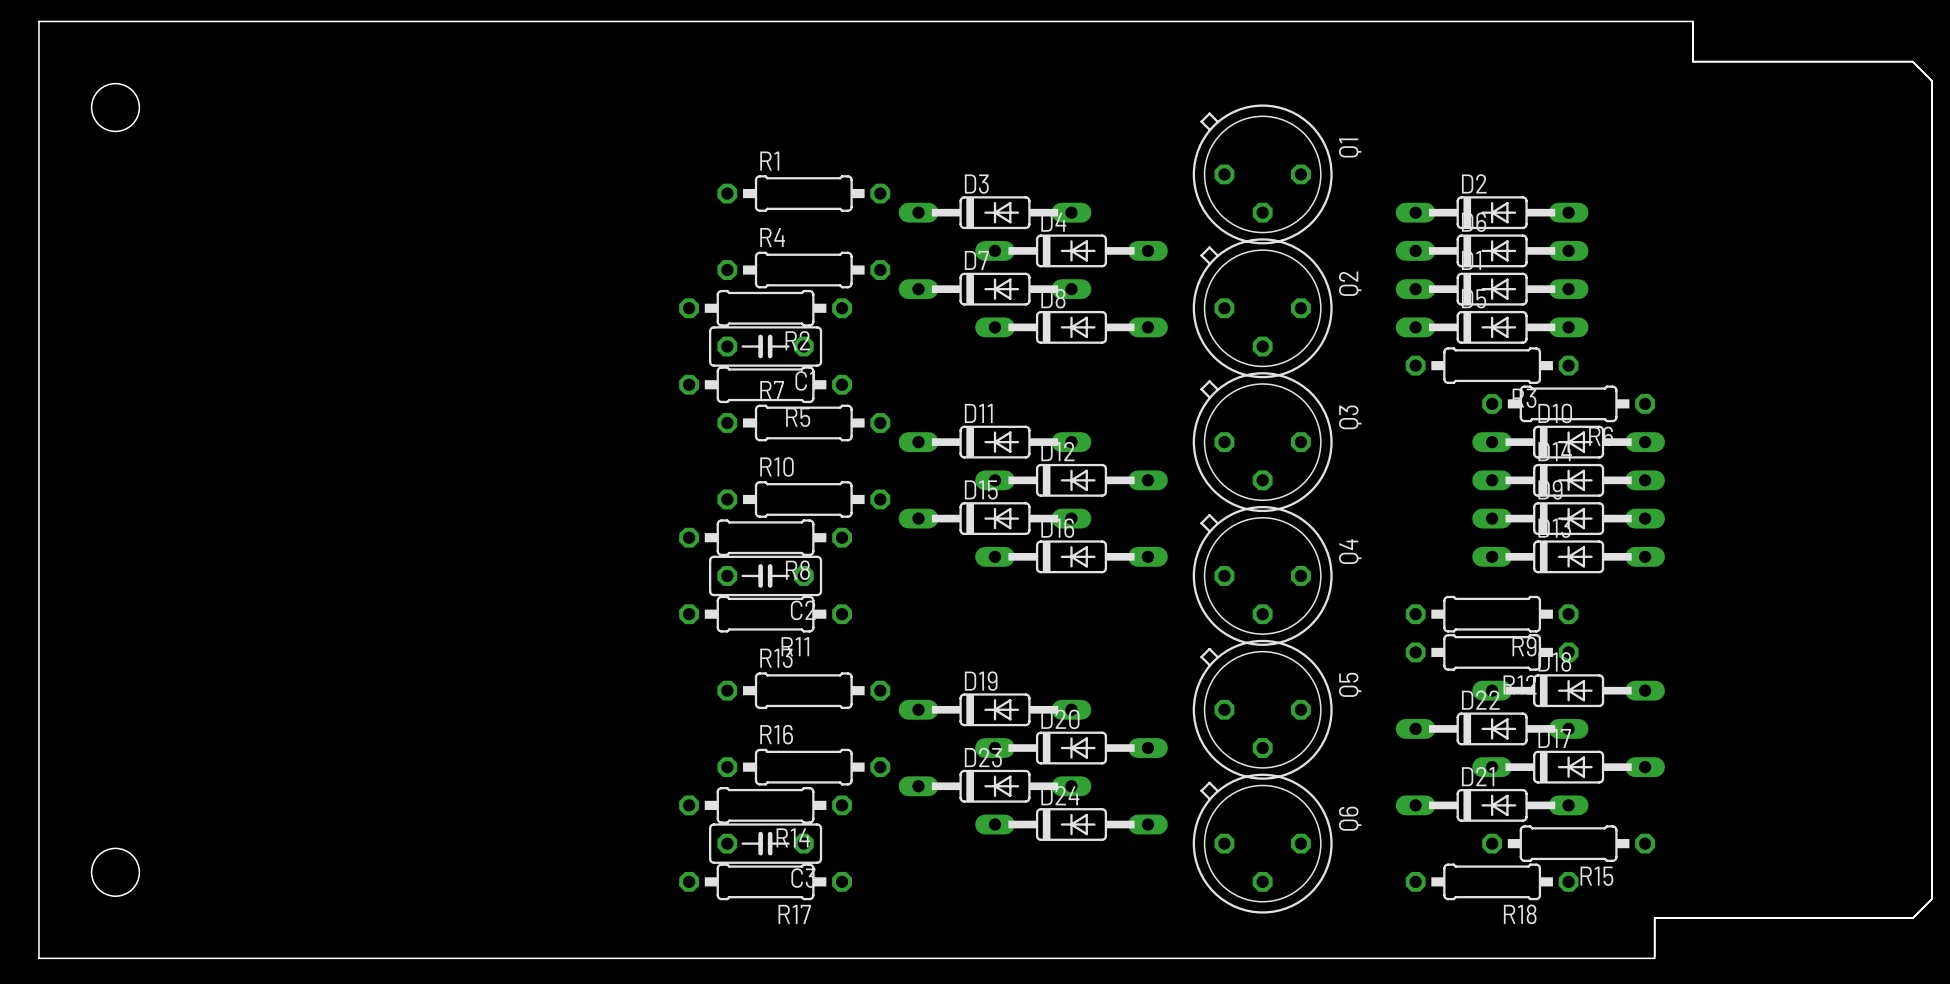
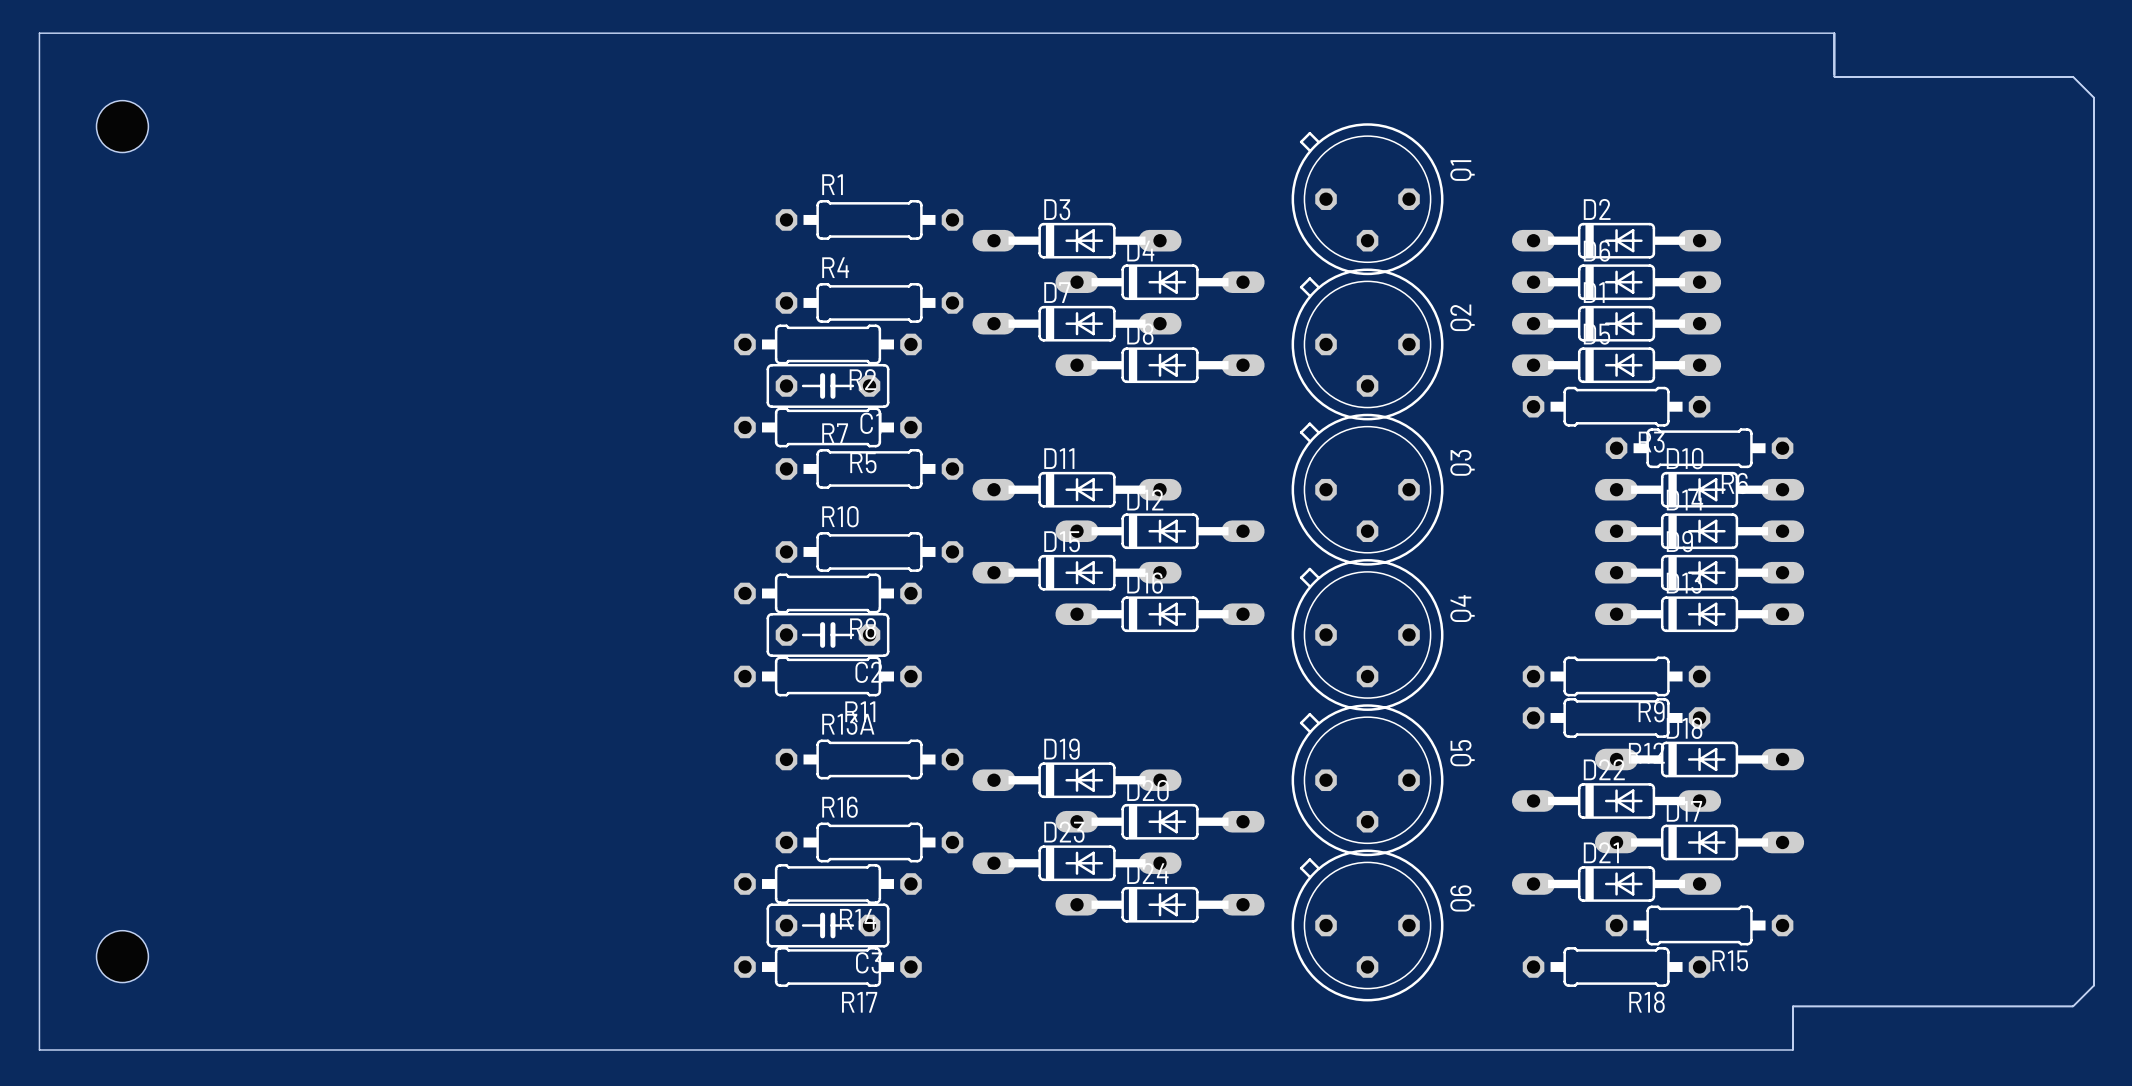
R13 name: R13 (776, 658) -> R13A (848, 724)

